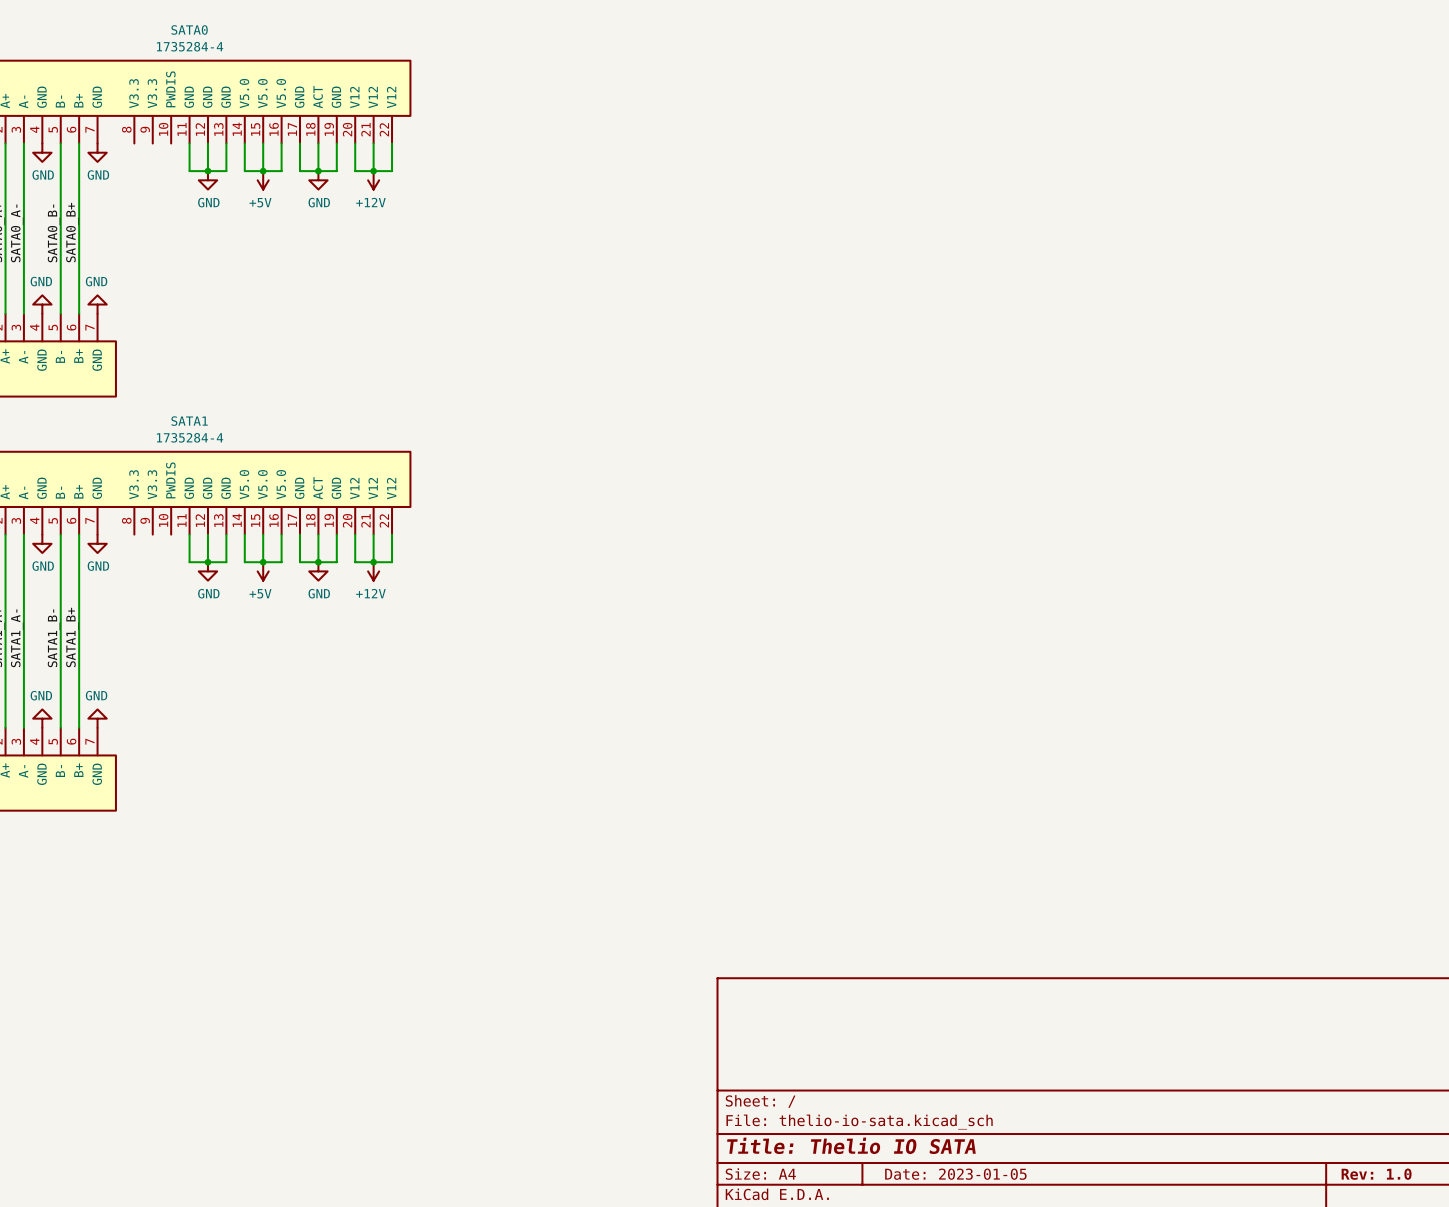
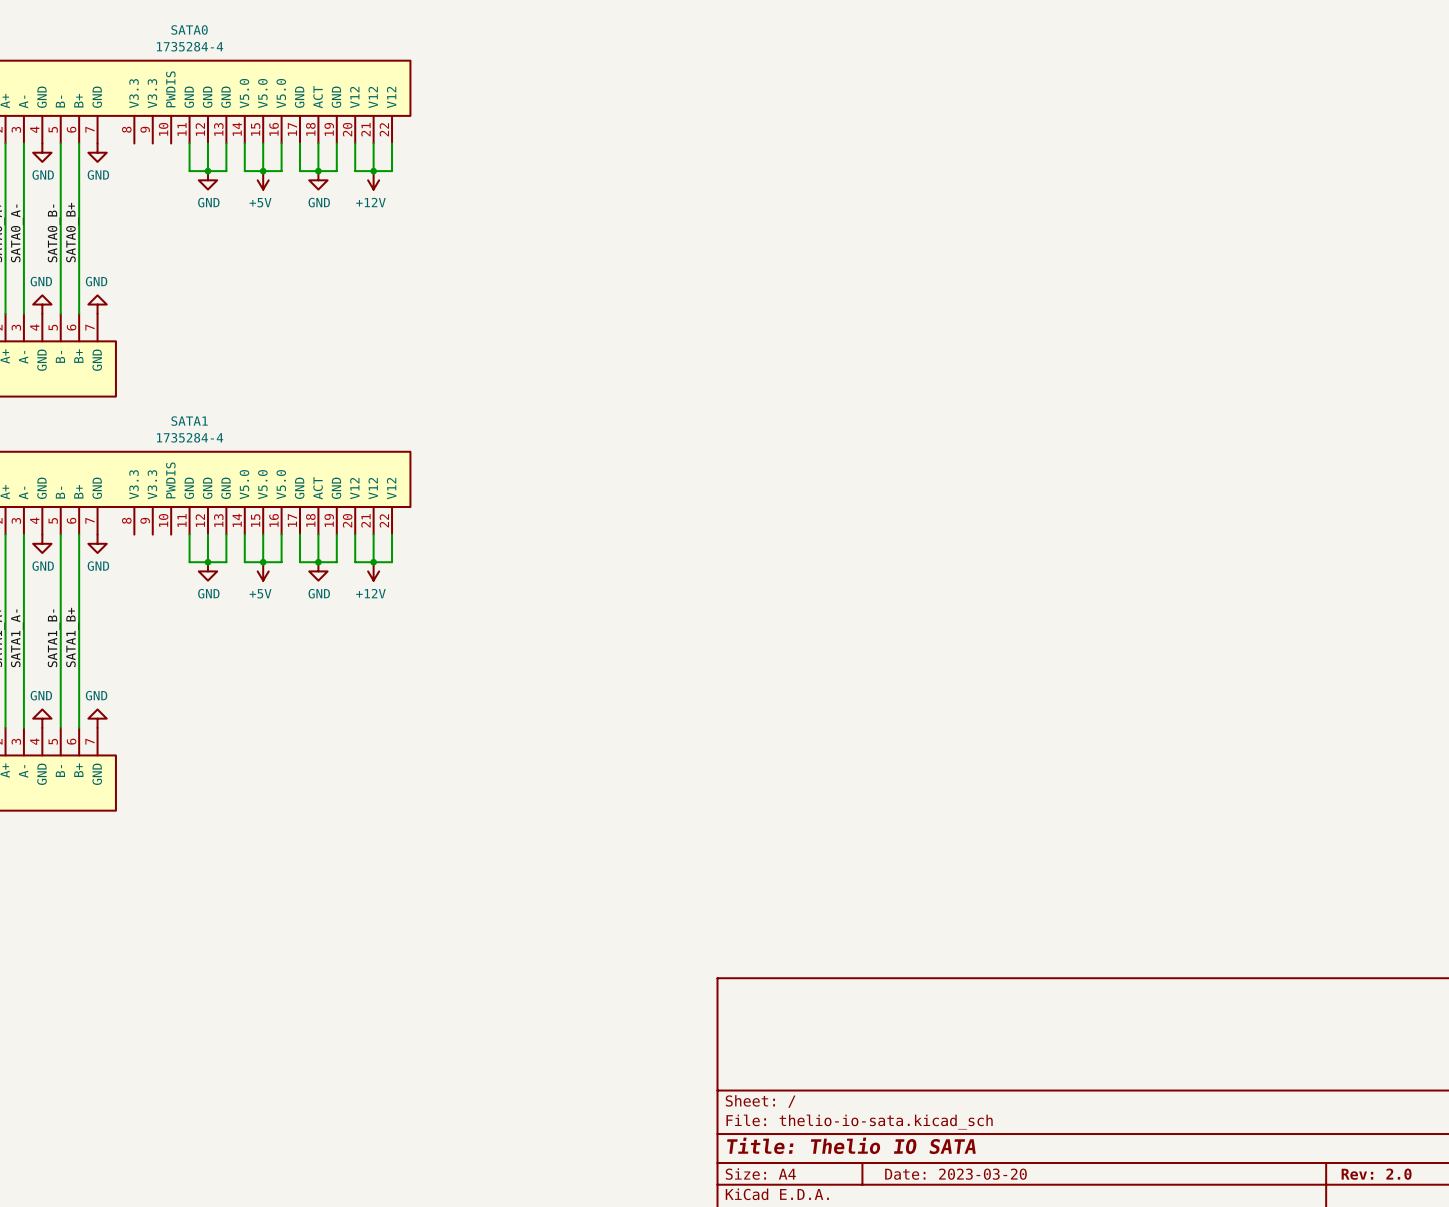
title block: Date: 2023-01-05 (955, 1174) -> Date: 2023-03-20 (955, 1174)
title block: Rev: 1.0 (1376, 1174) -> Rev: 2.0 (1376, 1174)

